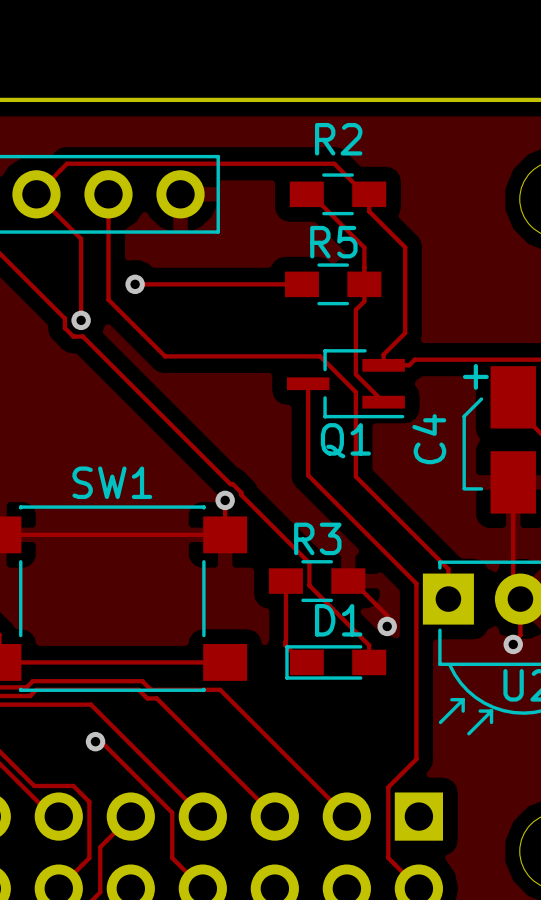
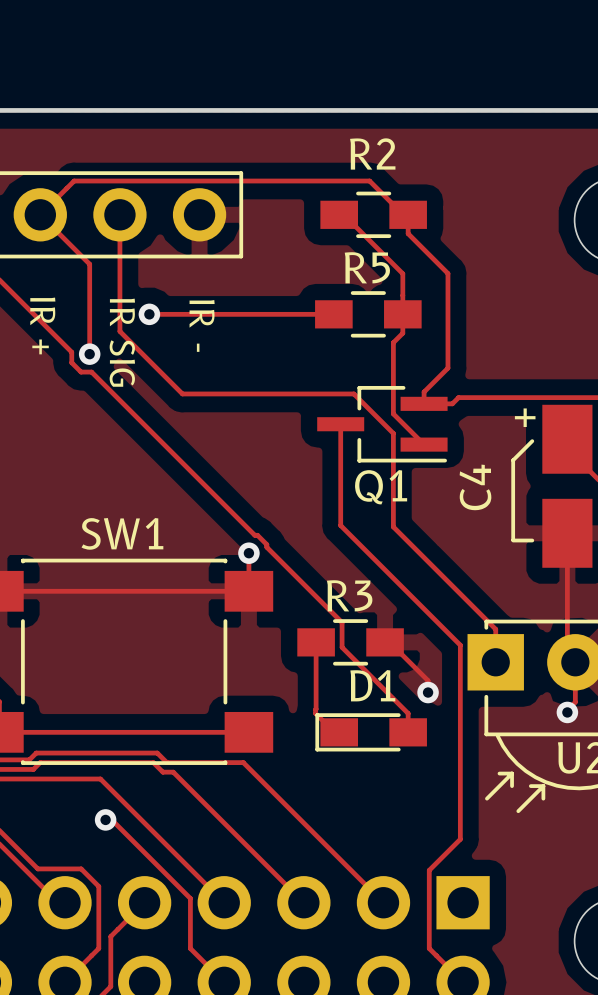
text: none -> IR + (42, 325)
text: none -> IR - (202, 325)
text: none -> IR SIG (122, 342)

